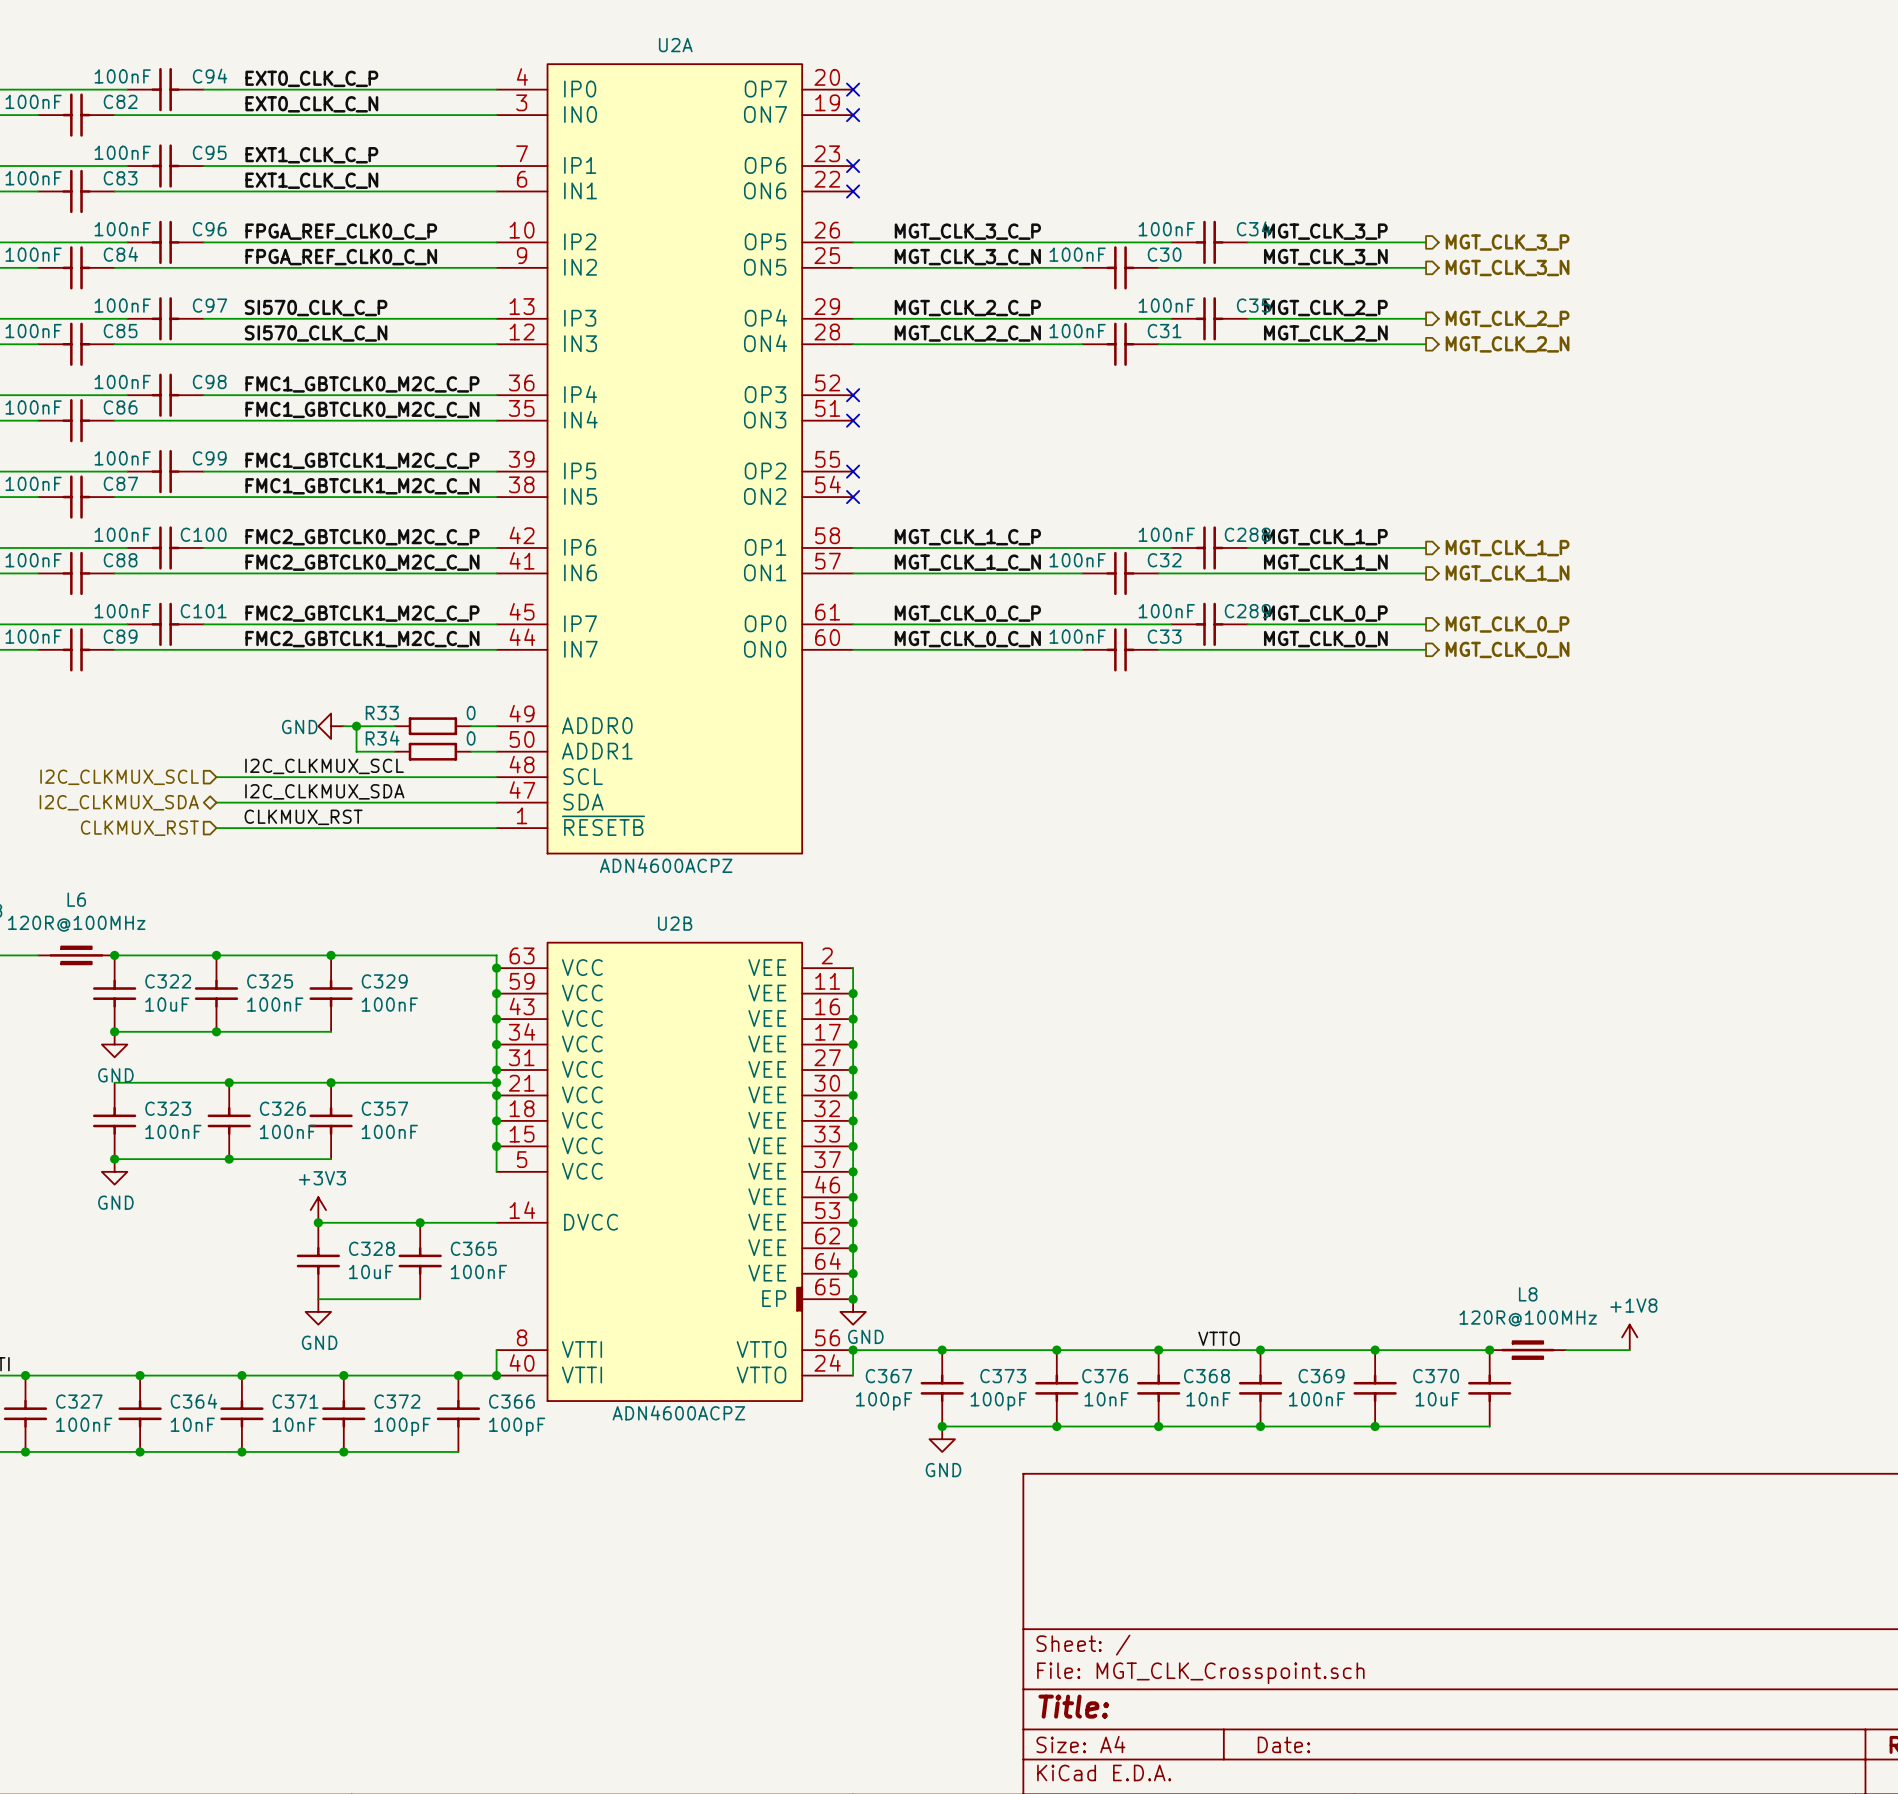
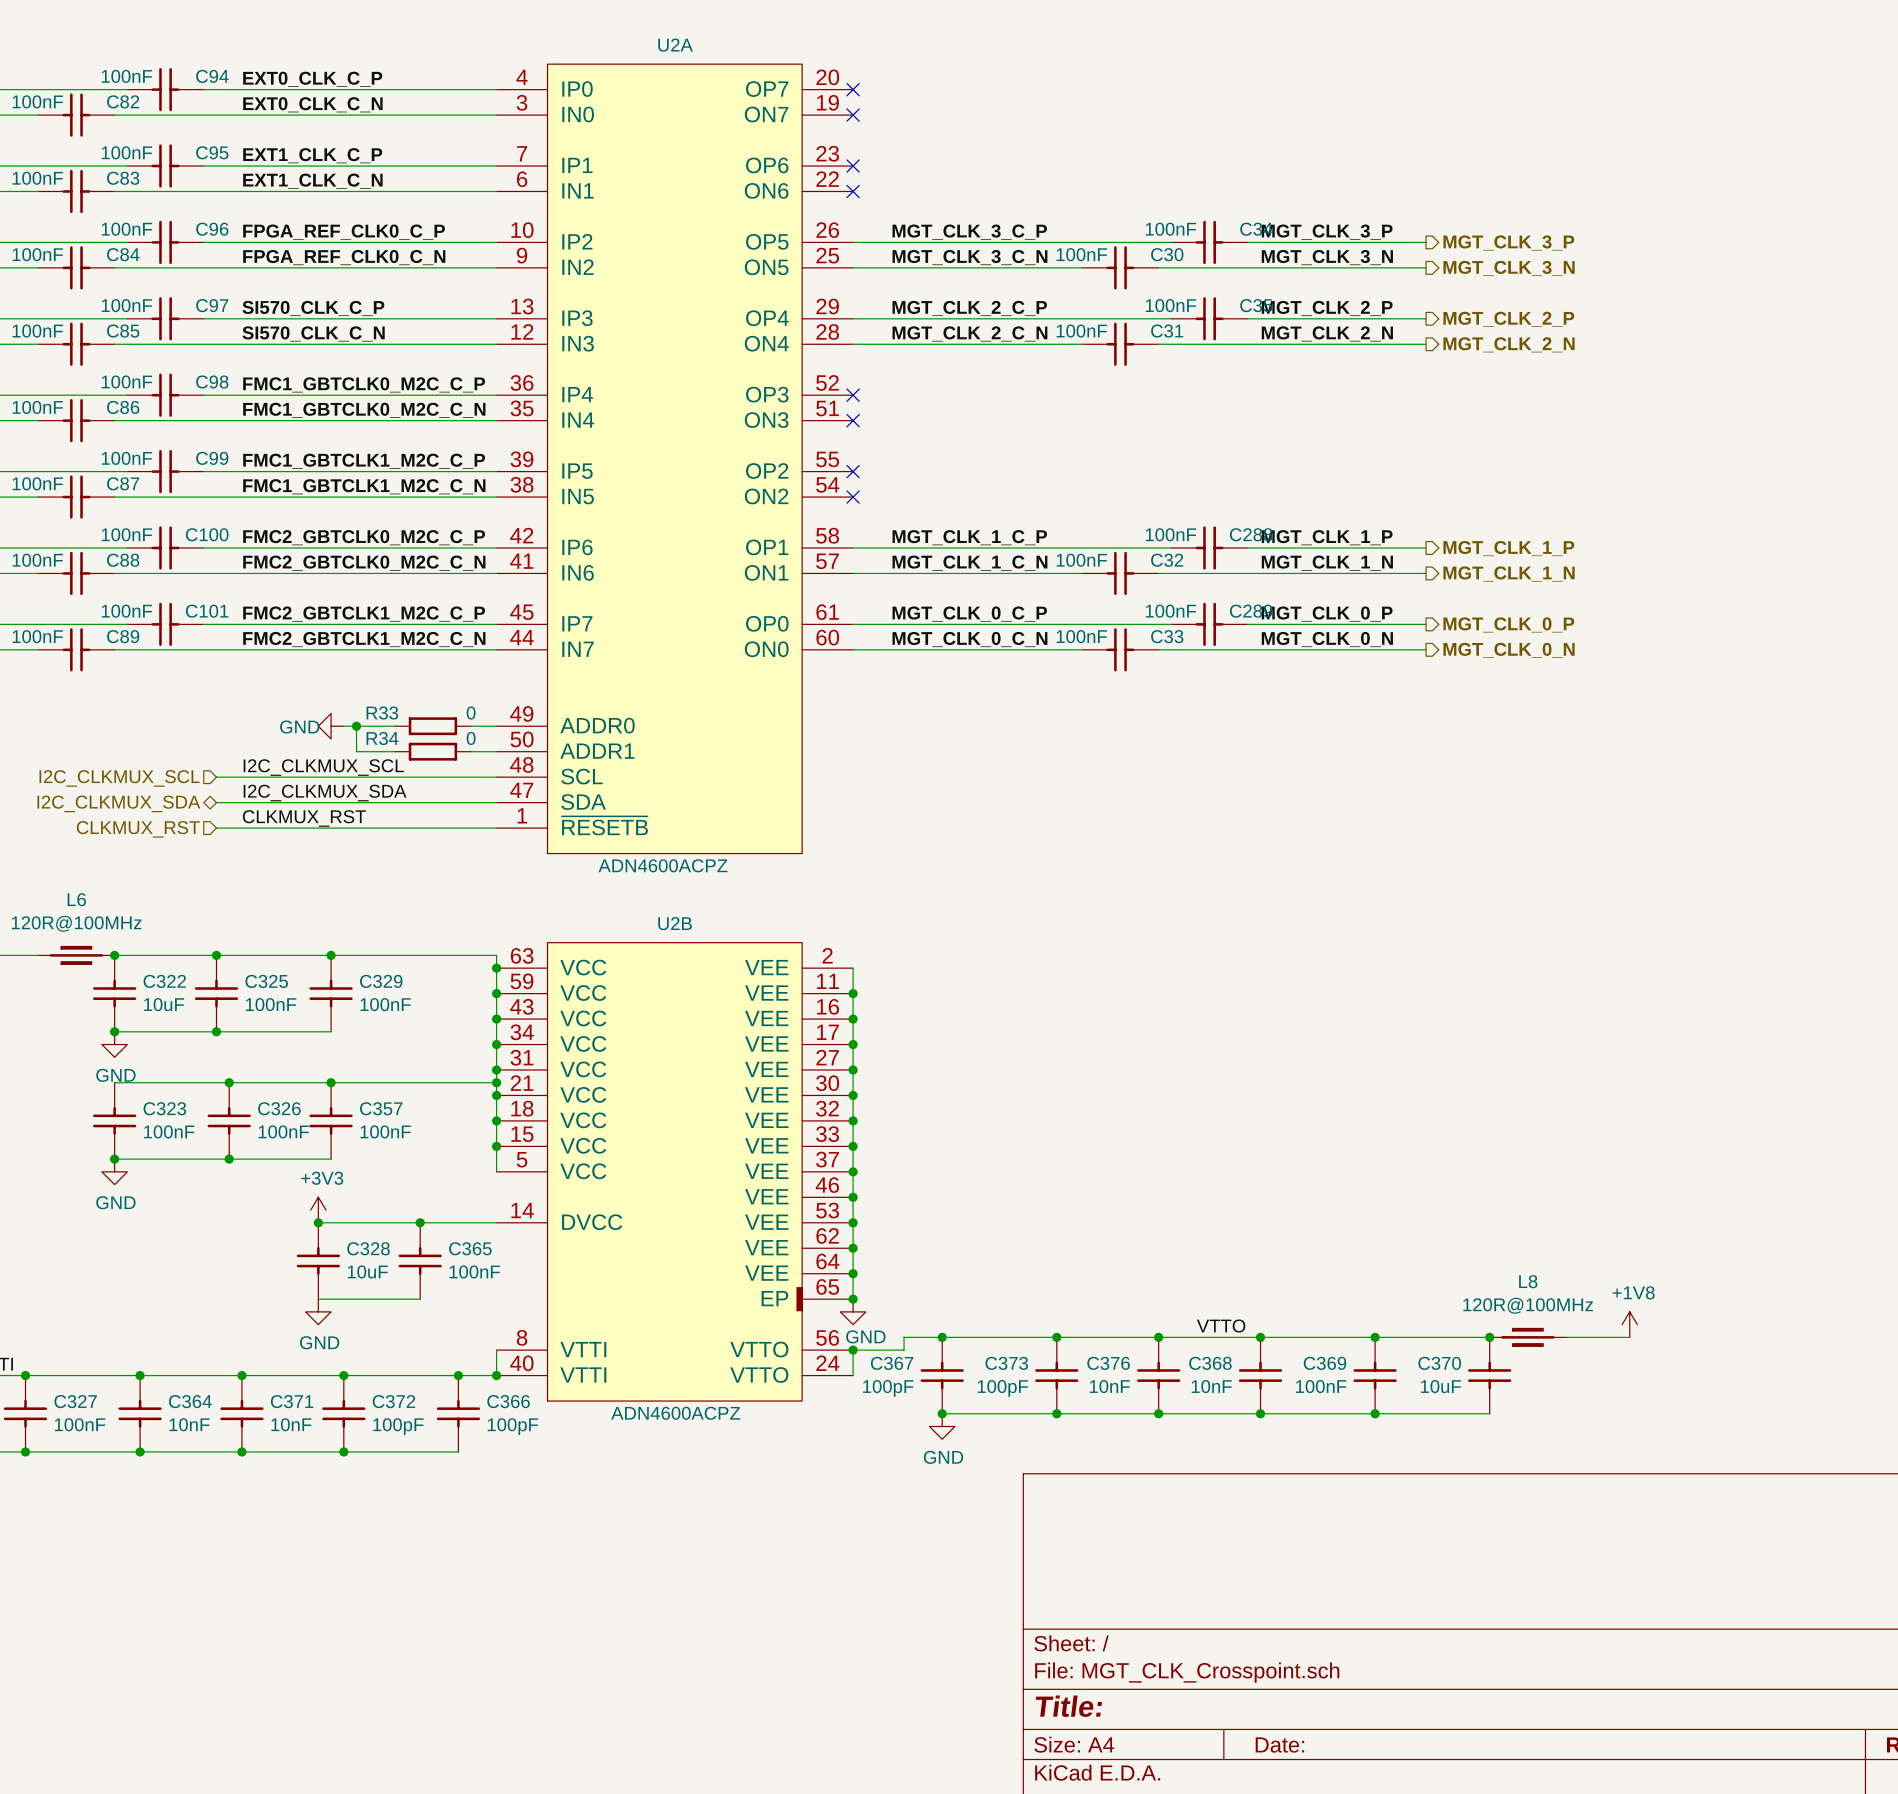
power symbol position: +1V8 (1629, 1337) -> +1V8 (1629, 1324)
label position: VTTO (1219, 1338) -> VTTO (1221, 1326)
wire: (904, 1350) (1489, 1350) -> (904, 1350) (904, 1337) (1489, 1337)
junction position: (942, 1350) -> (942, 1337)
junction position: (1056, 1350) -> (1056, 1337)
junction position: (1158, 1350) -> (1158, 1337)
junction position: (1260, 1350) -> (1260, 1337)
junction position: (1375, 1350) -> (1375, 1337)
junction position: (1489, 1350) -> (1489, 1337)
L8 position: (1527, 1350) -> (1527, 1337)
wire: (1566, 1350) (1629, 1350) -> (1566, 1337) (1629, 1337)
C367 position: (942, 1388) -> (942, 1375)
C373 position: (1056, 1388) -> (1056, 1375)
C376 position: (1158, 1388) -> (1158, 1375)
C368 position: (1260, 1388) -> (1260, 1375)
C369 position: (1375, 1388) -> (1375, 1375)
C370 position: (1489, 1388) -> (1489, 1375)
wire: (942, 1426) (1489, 1426) -> (942, 1413) (1489, 1413)
junction position: (942, 1426) -> (942, 1413)
junction position: (1056, 1426) -> (1056, 1413)
junction position: (1158, 1426) -> (1158, 1413)
junction position: (1260, 1426) -> (1260, 1413)
junction position: (1375, 1426) -> (1375, 1413)
power symbol position: GND (942, 1439) -> GND (942, 1426)

